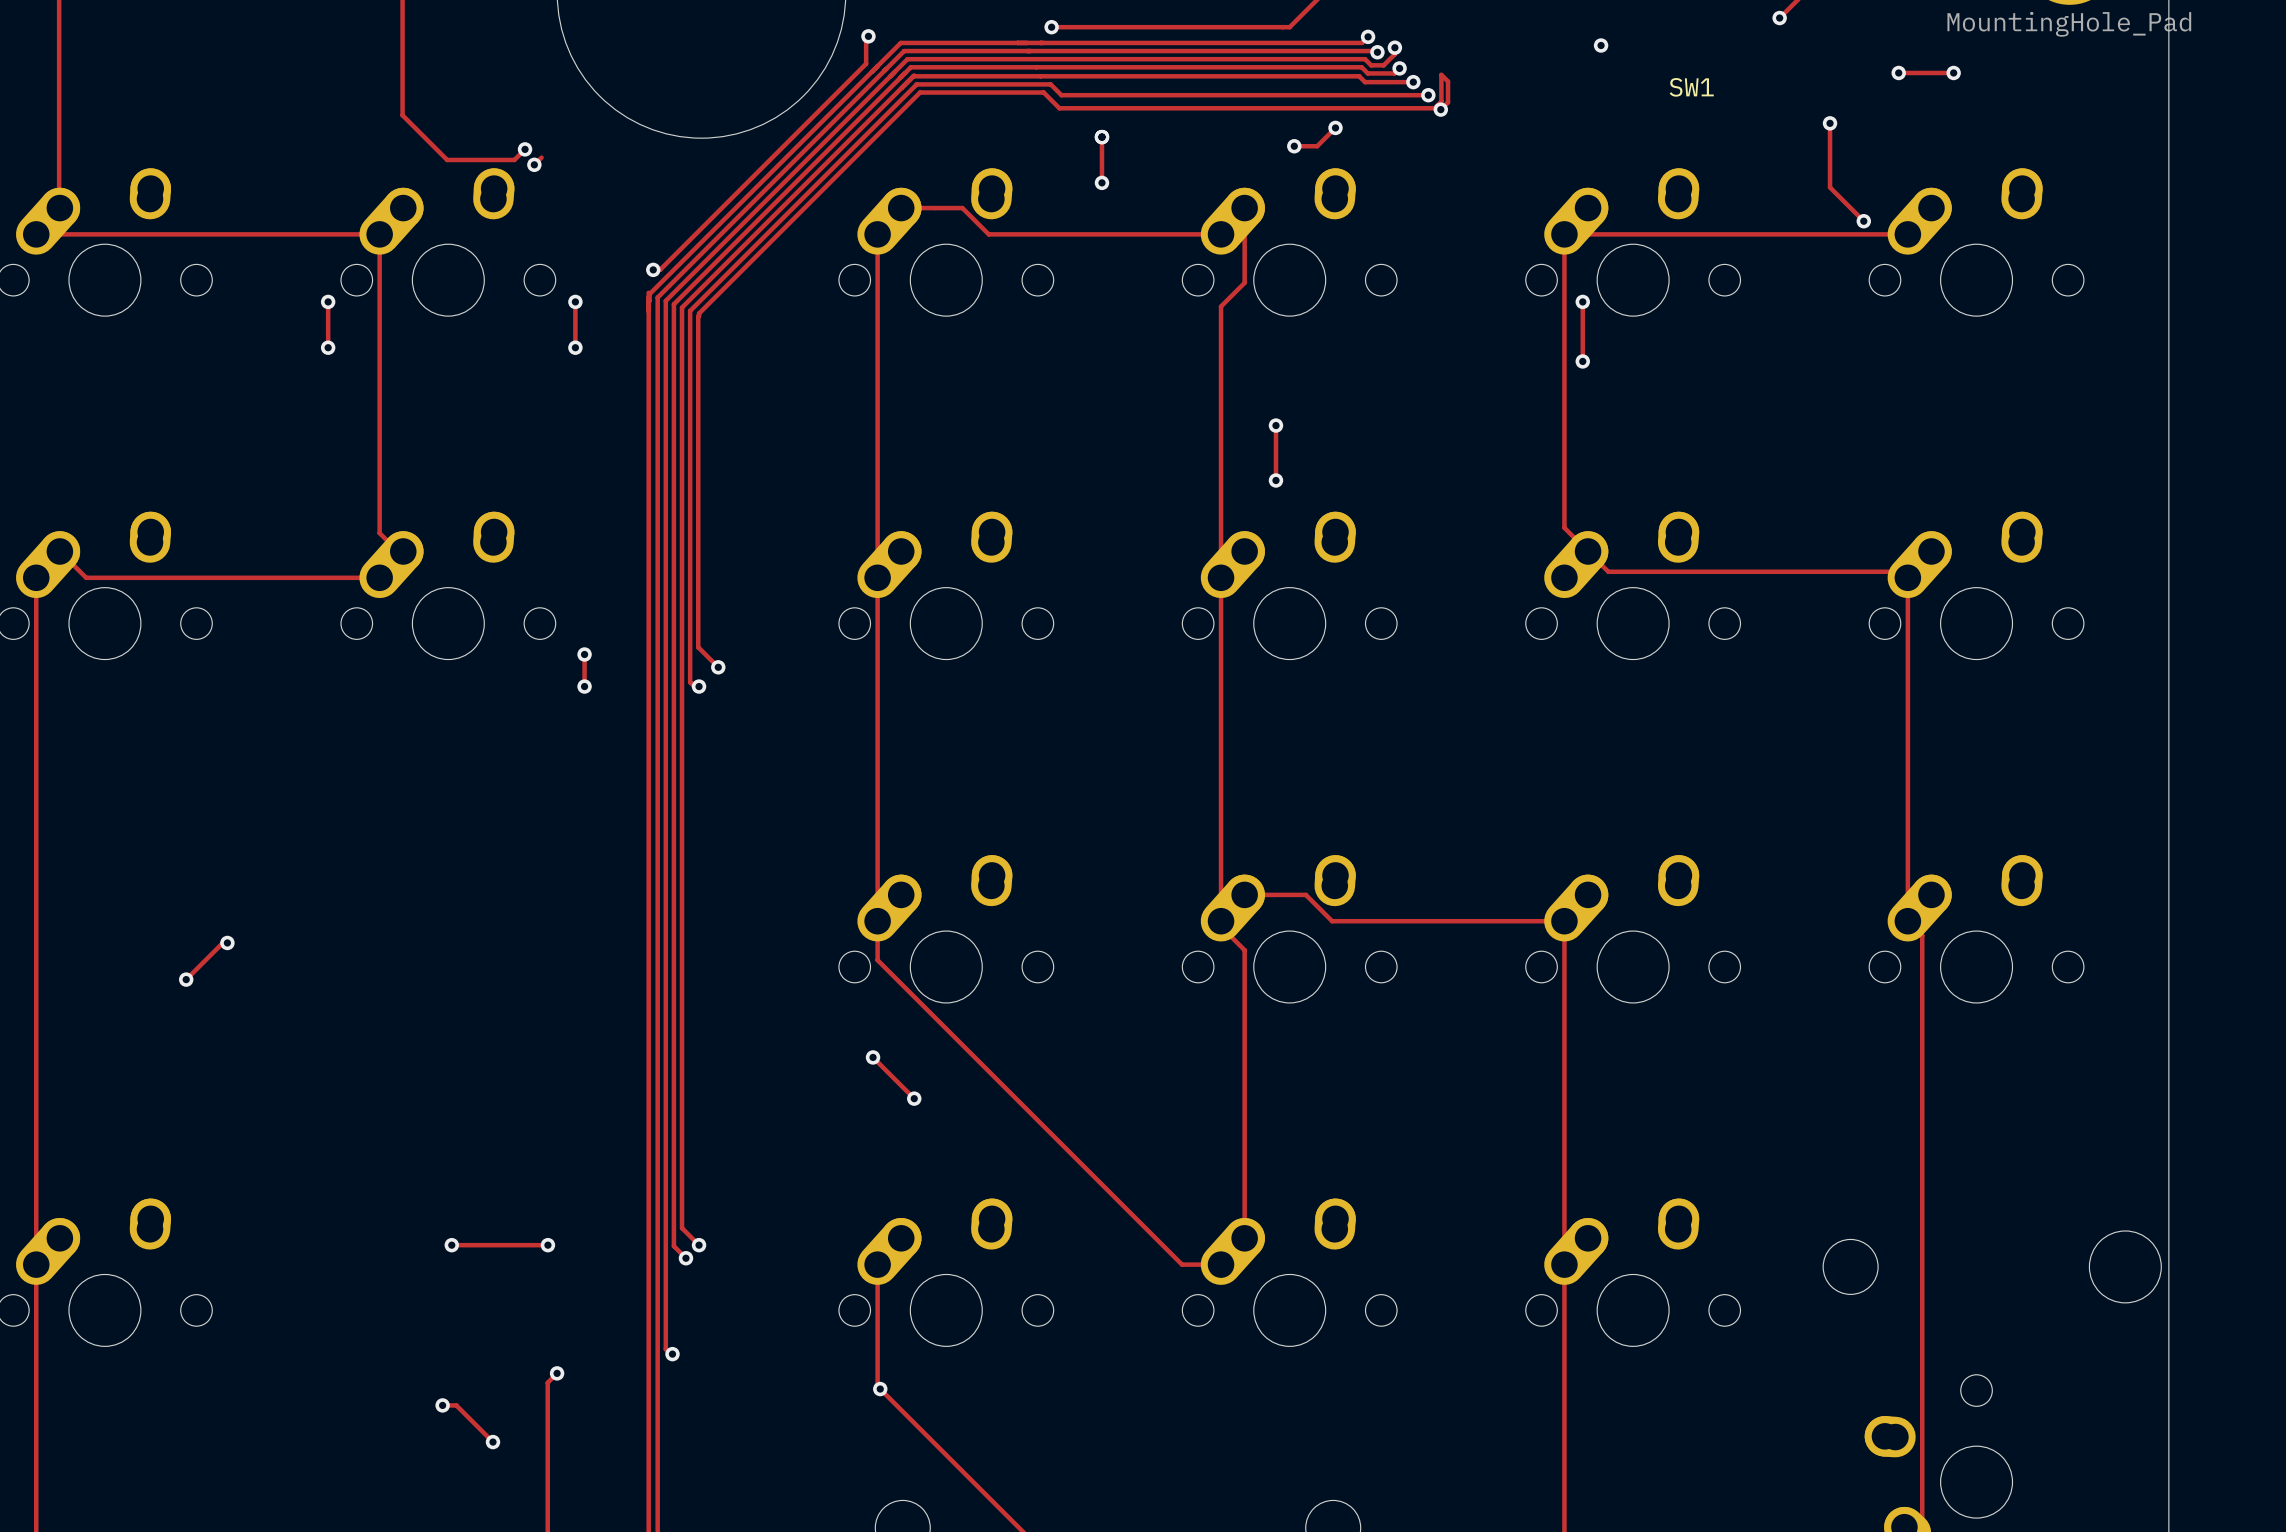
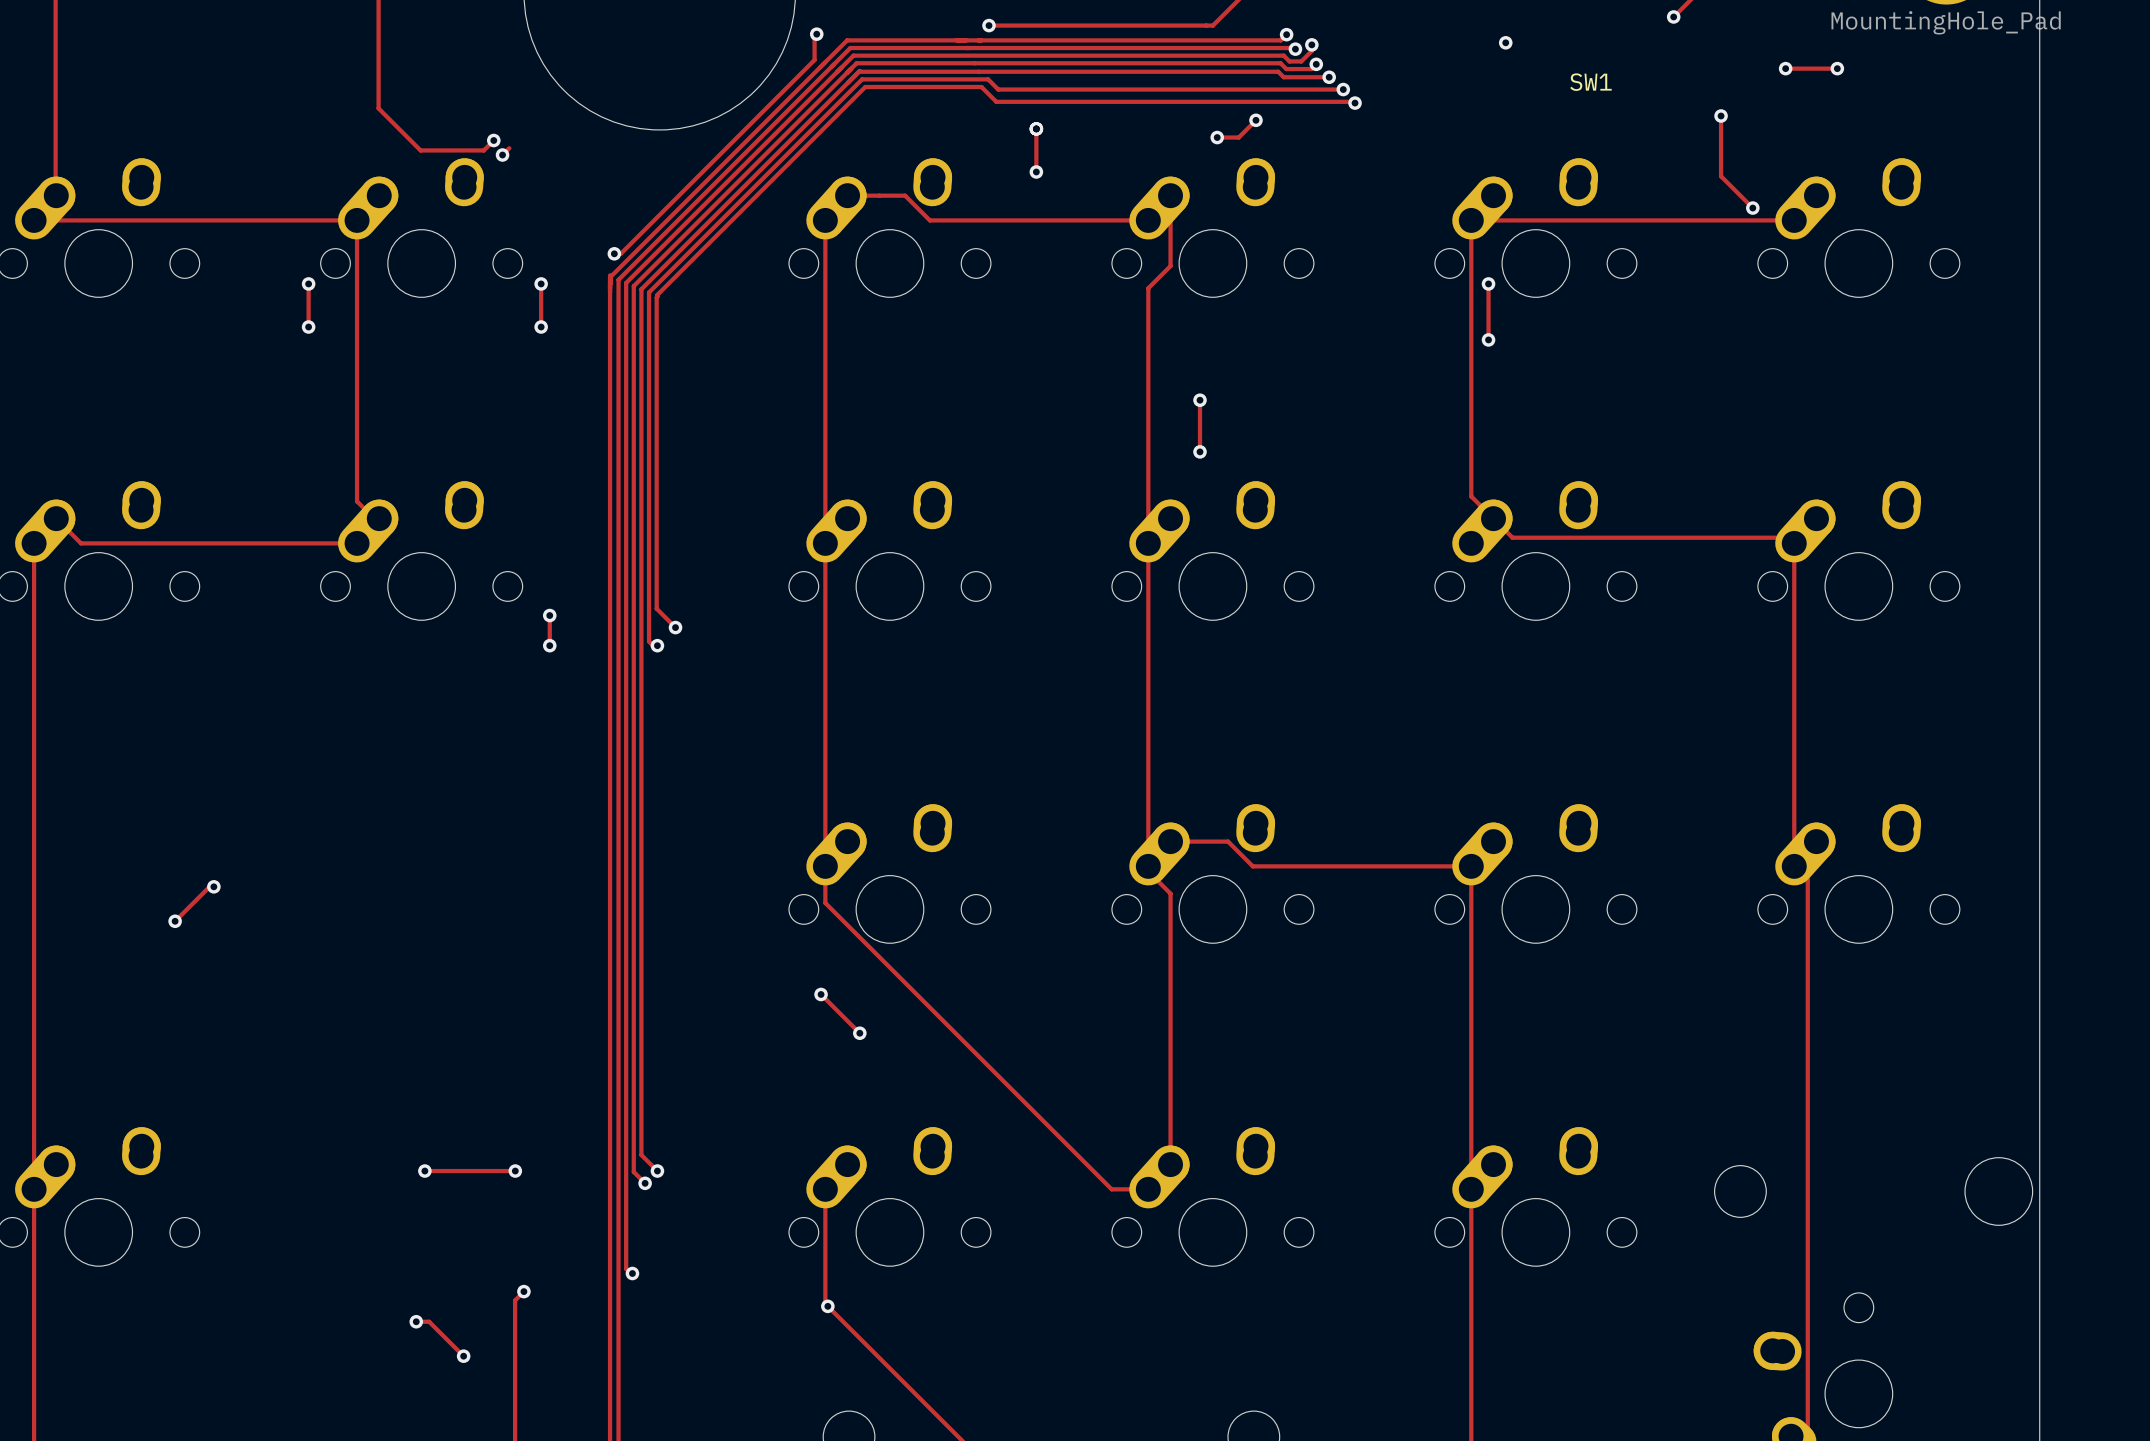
track: (1434, 108) (1441, 101) (1441, 74) (1448, 81) (1448, 102) (1440, 109) -> none

